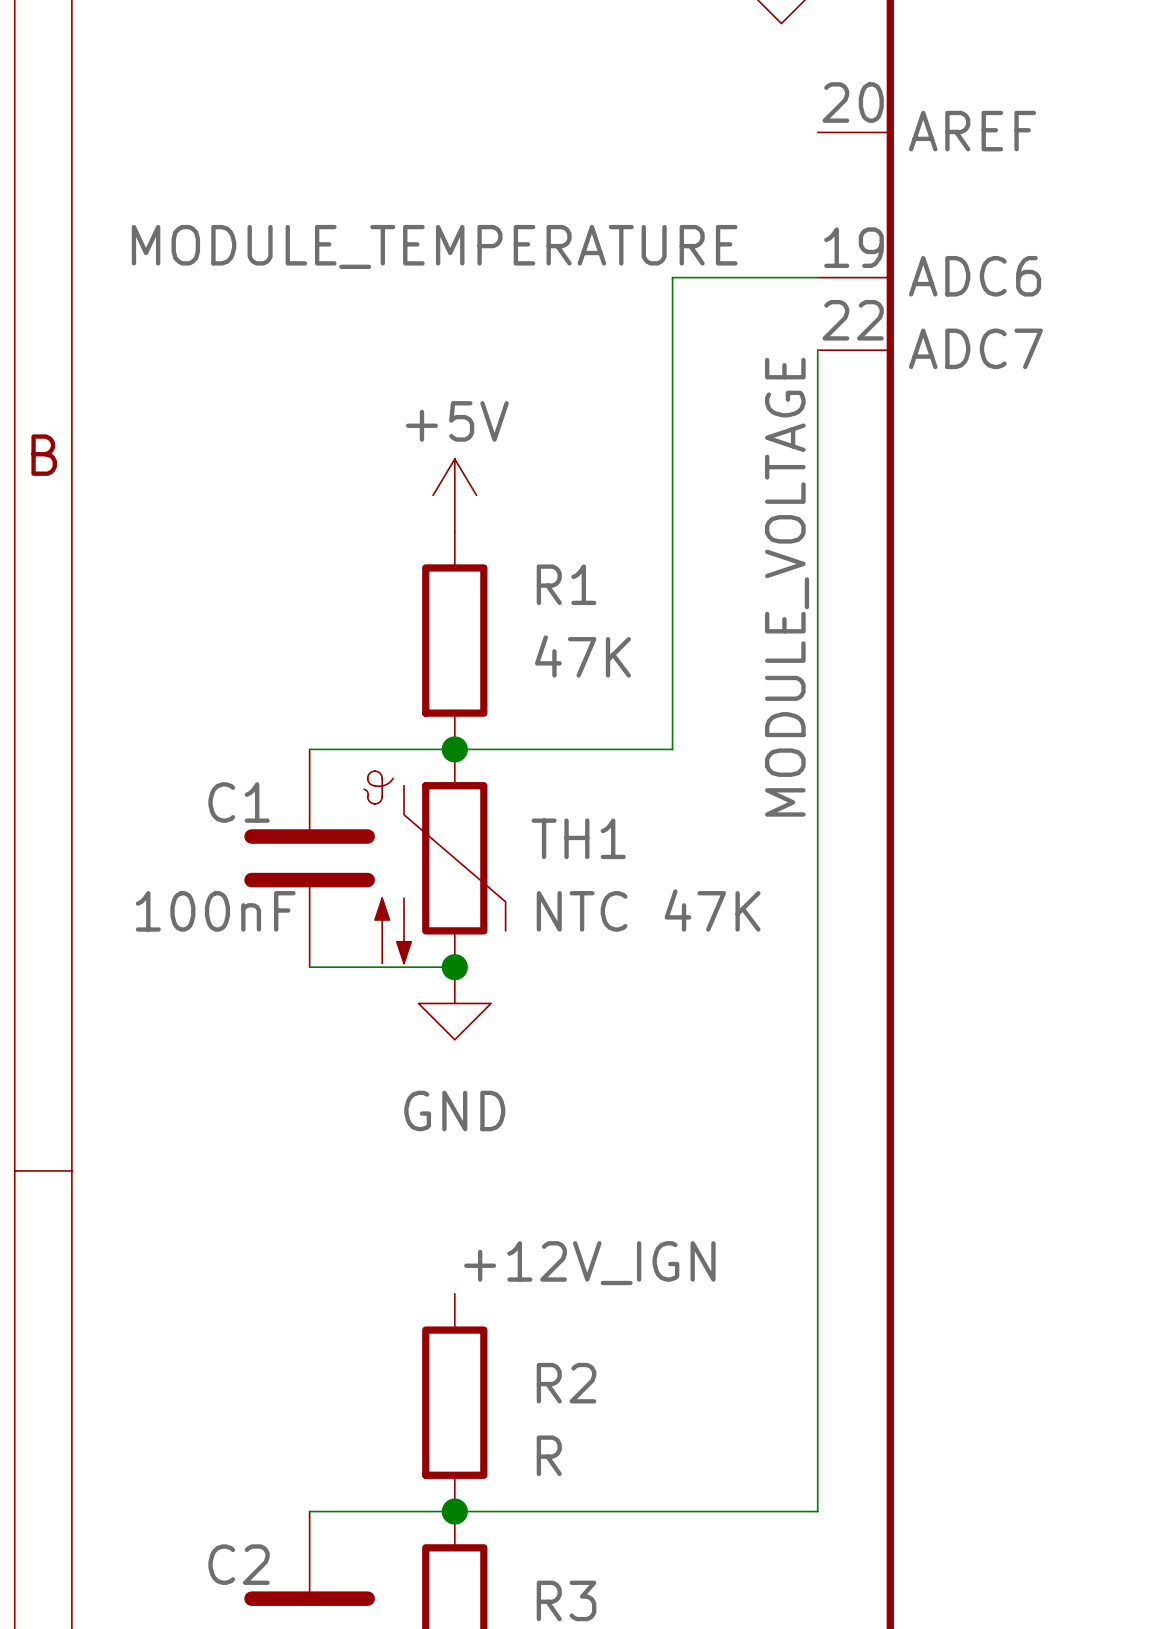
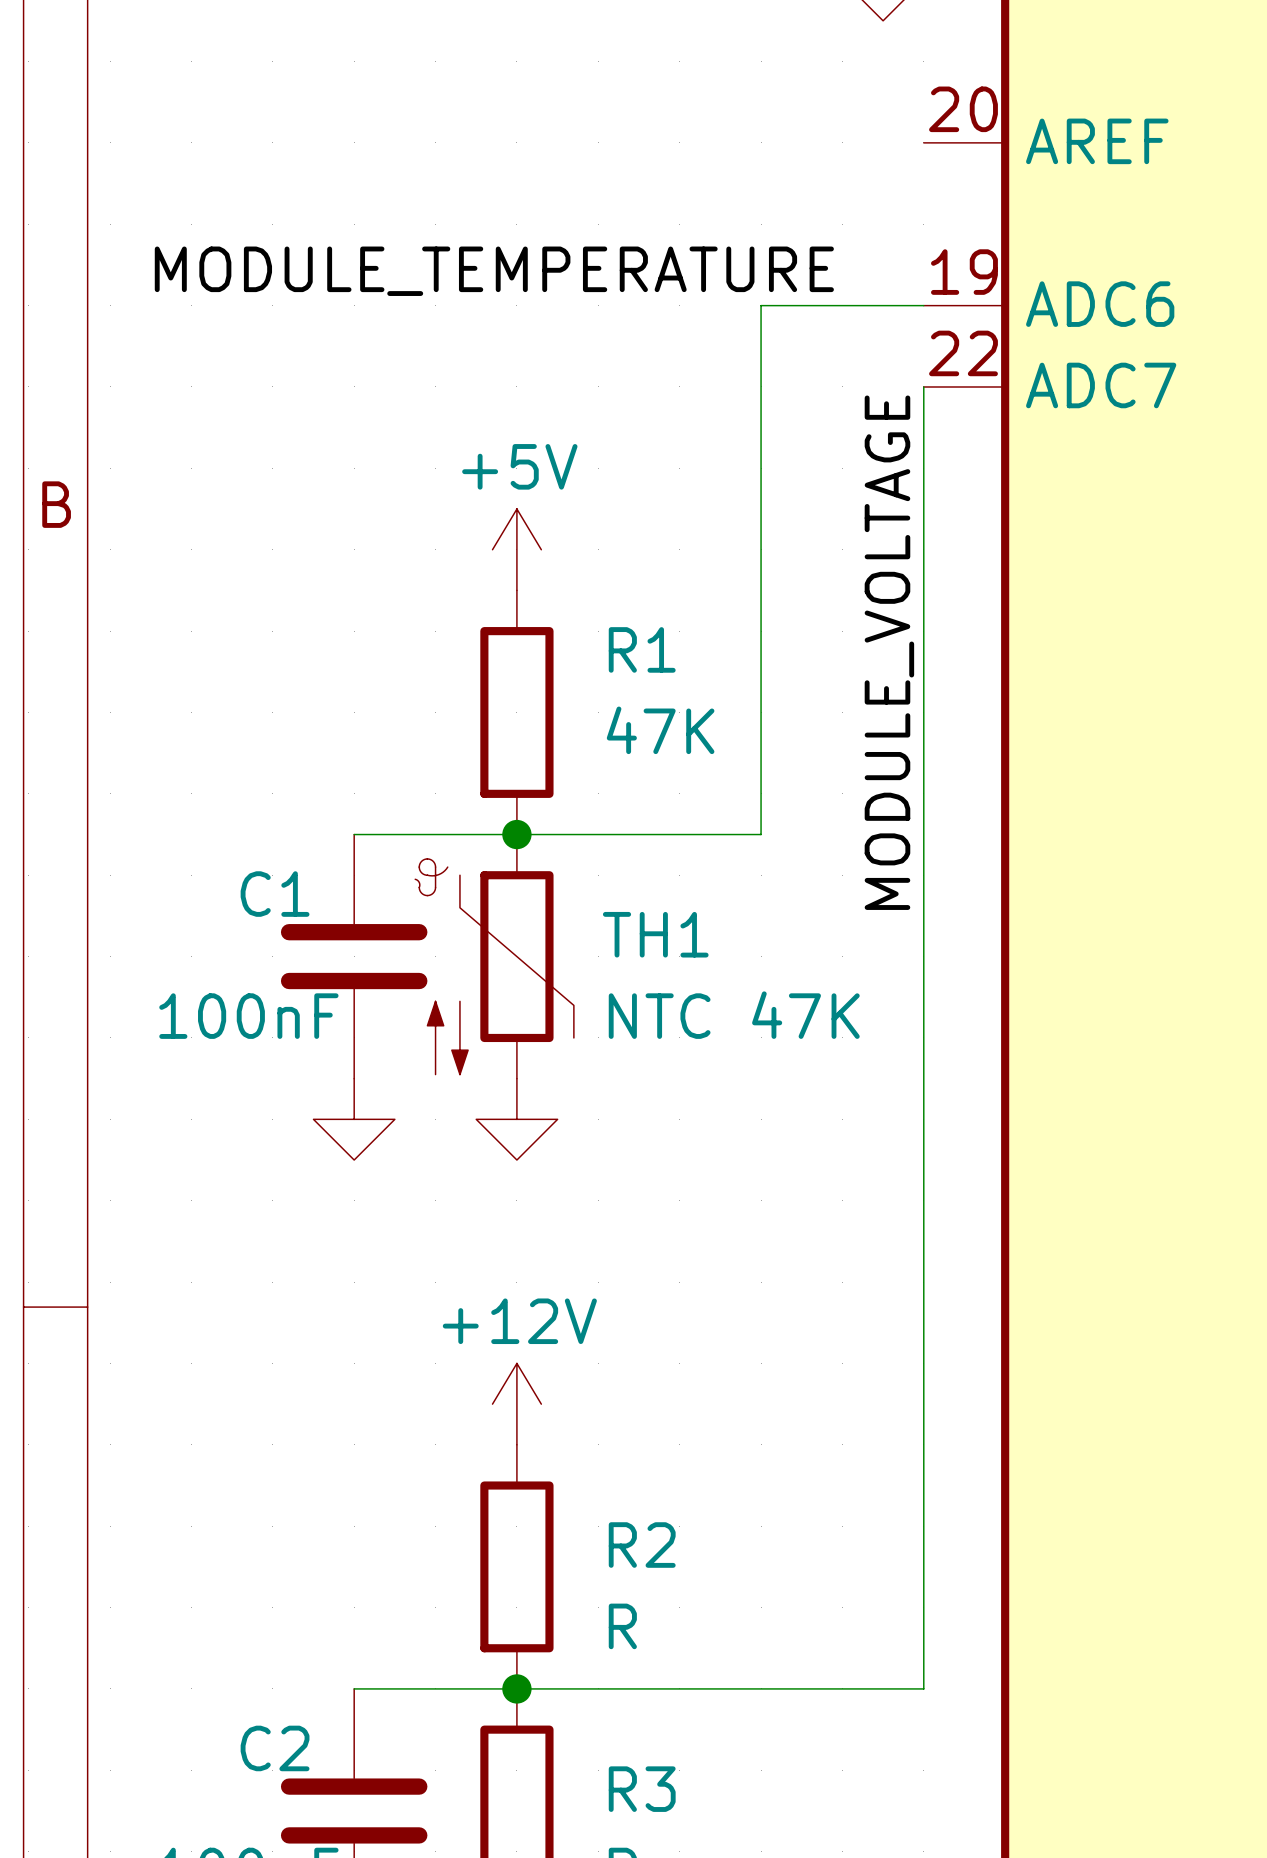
wire: (309, 967) (454, 967) -> none
junction: (454, 967) -> none
power symbol: none -> (354, 1119)
power symbol text: GND (454, 1110) -> none
power symbol: none -> +12V (516, 1404)
label: +12V_IGN (589, 1263) -> none

